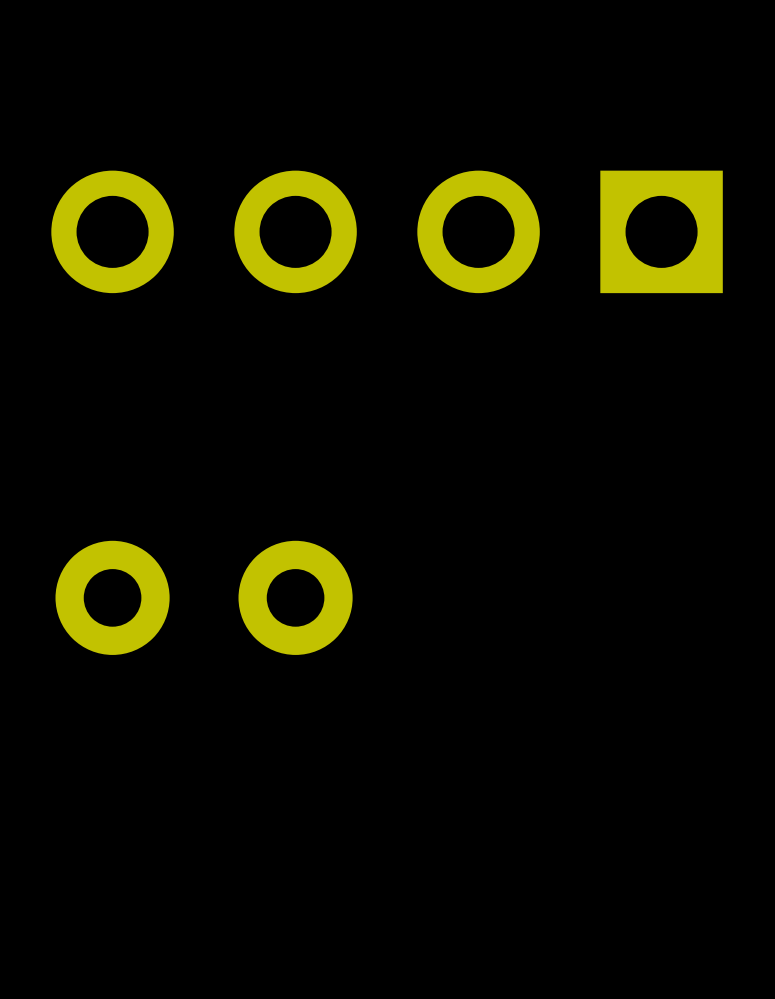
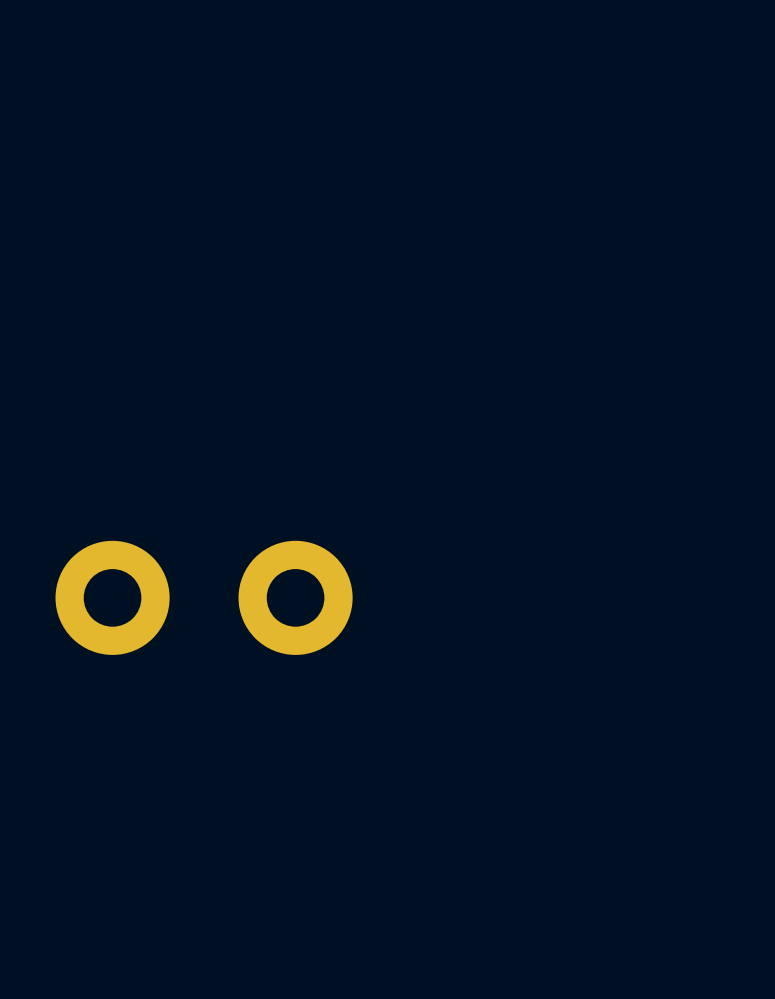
part: (387, 231) -> none

